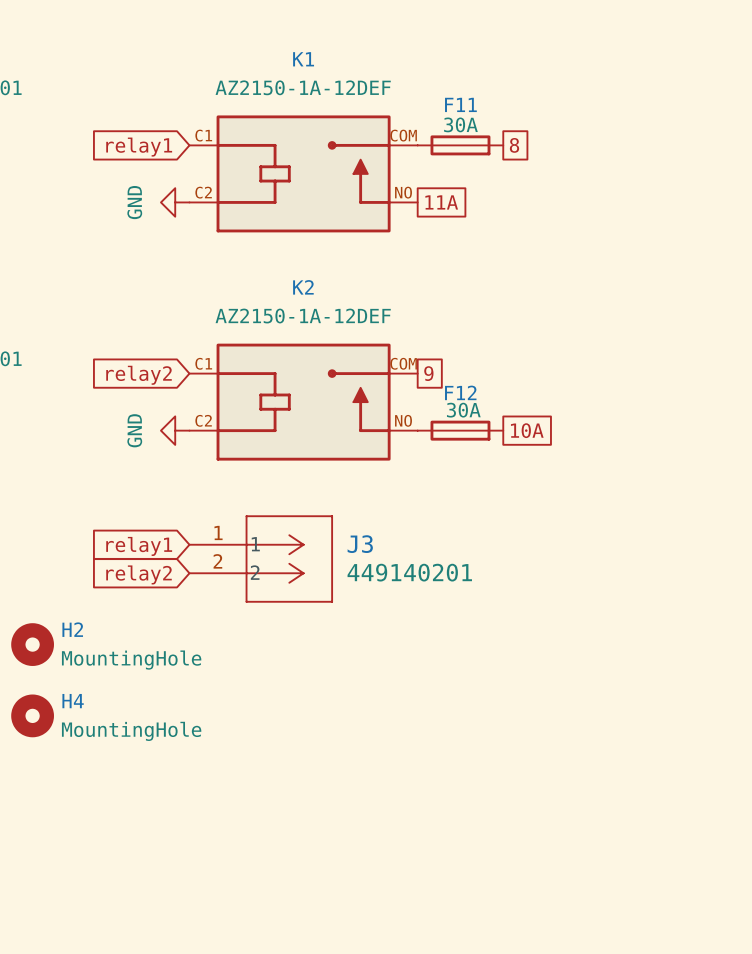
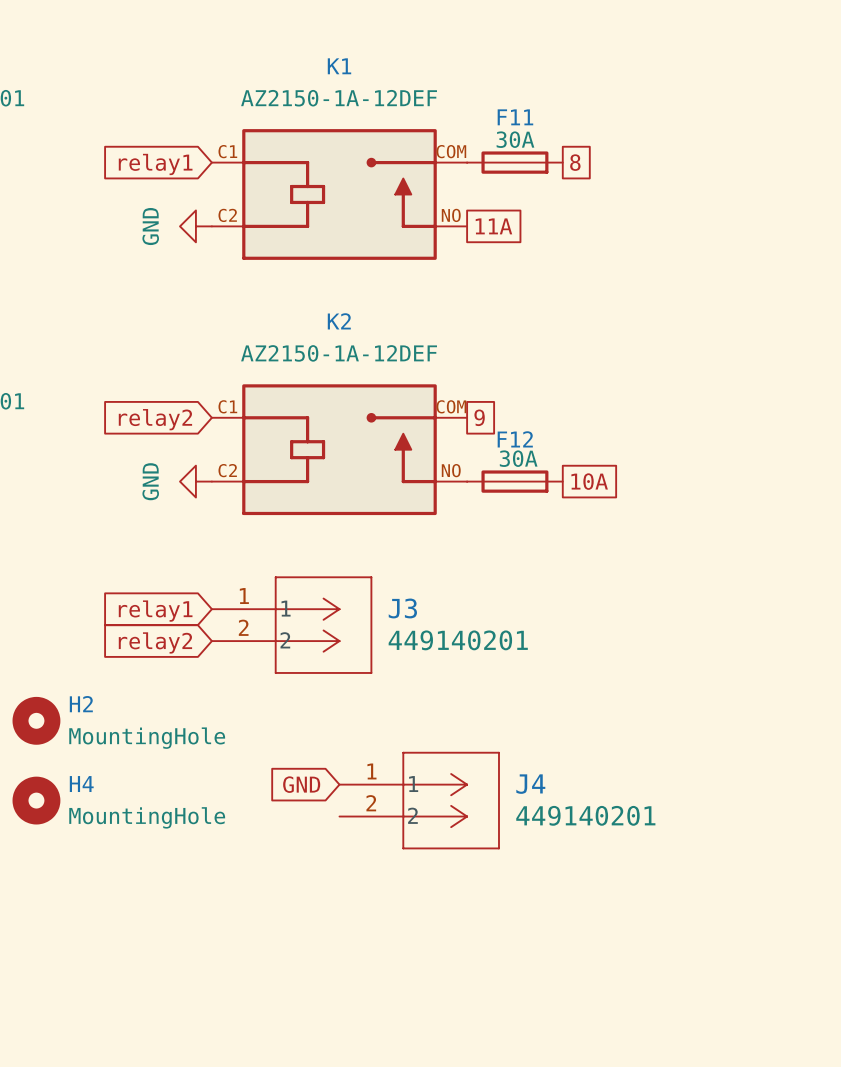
global label: none -> GND (301, 784)
J4: none -> 449140201 (419, 800)

